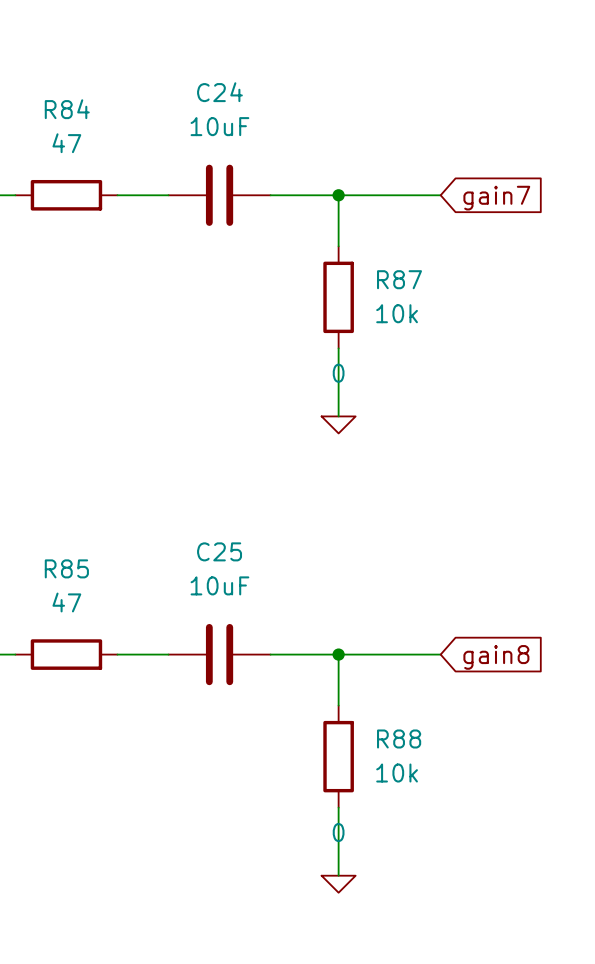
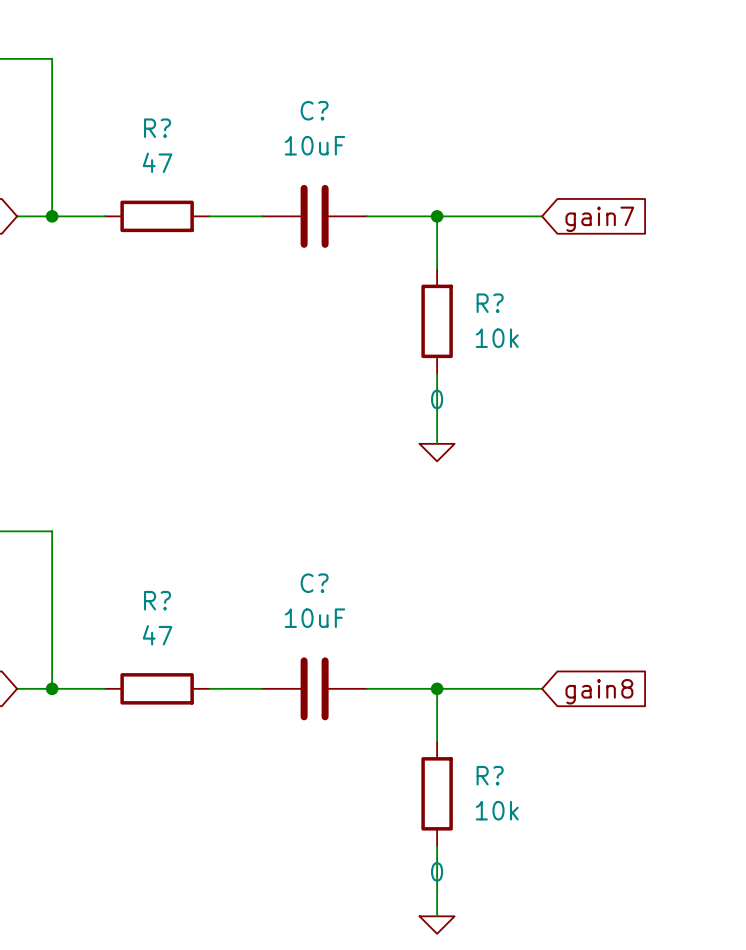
C24 name: C24 (219, 92) -> C? (314, 110)
R84 name: R84 (67, 109) -> R? (157, 128)
R87 name: R87 (399, 279) -> R? (490, 303)
C25 name: C25 (219, 551) -> C? (314, 583)
R85 name: R85 (66, 568) -> R? (157, 600)
R88 name: R88 (399, 738) -> R? (490, 775)

